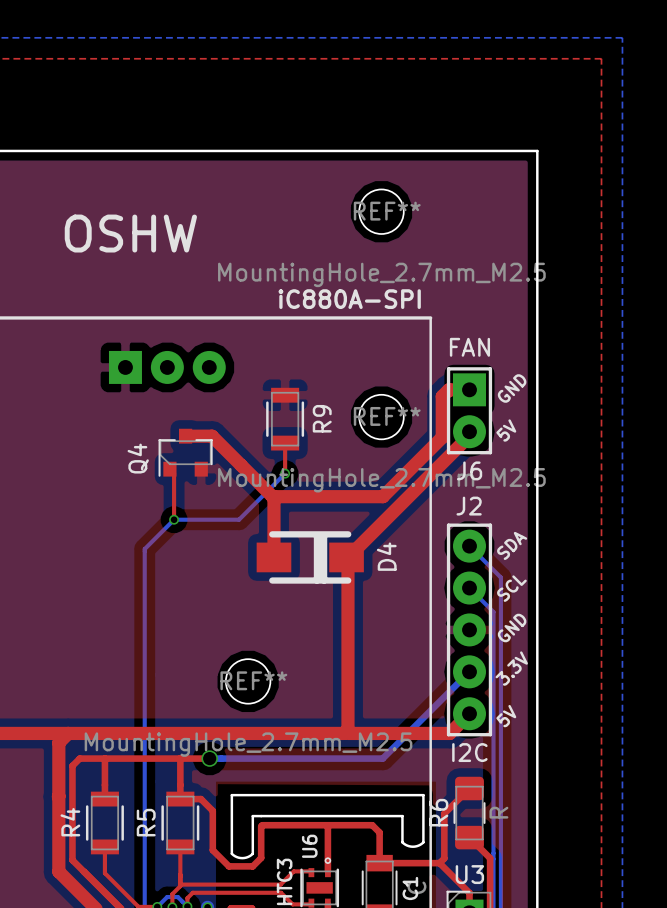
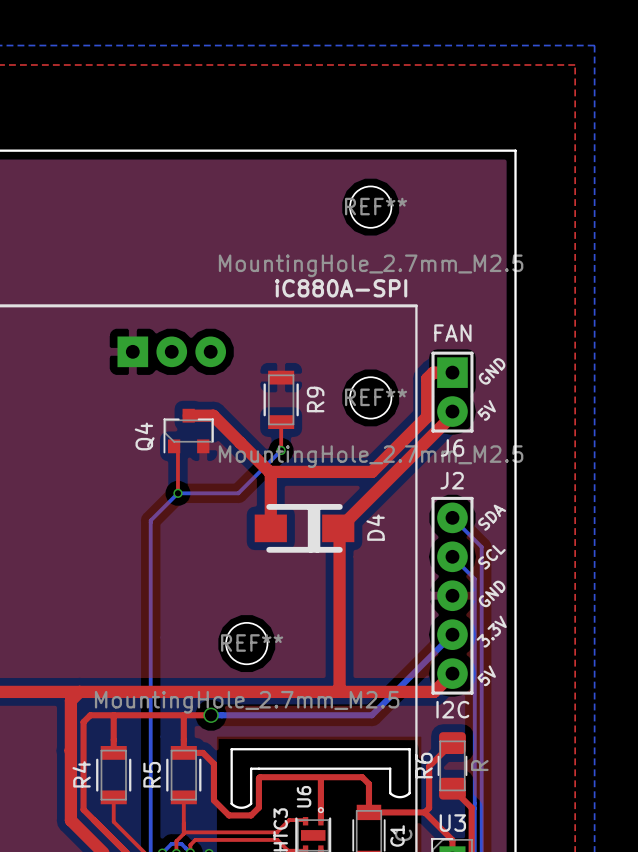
text: OSHW (130, 233) -> none

